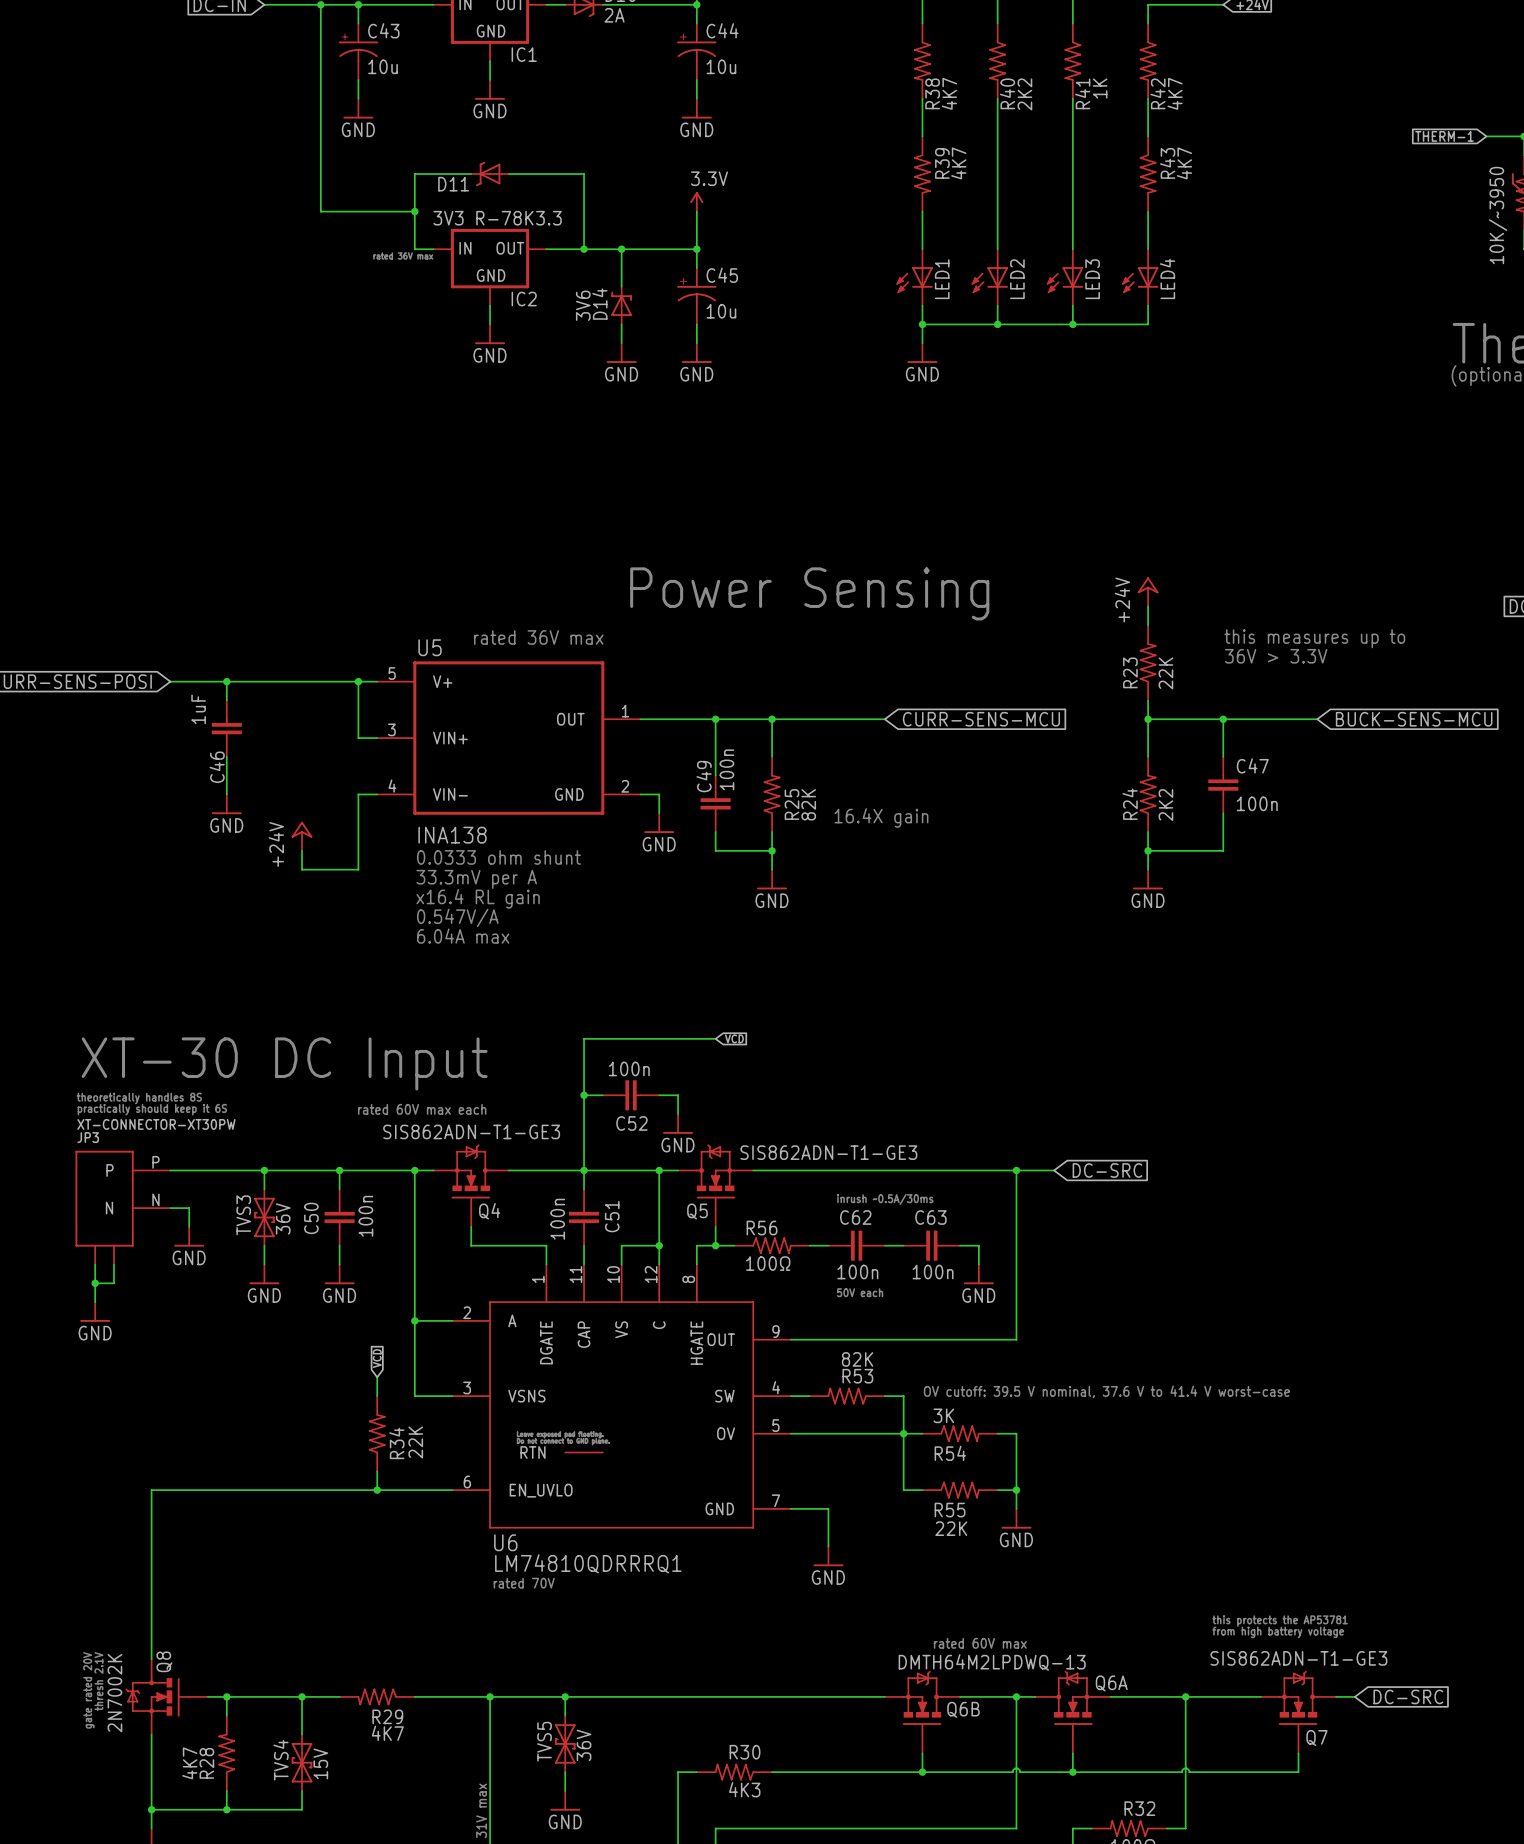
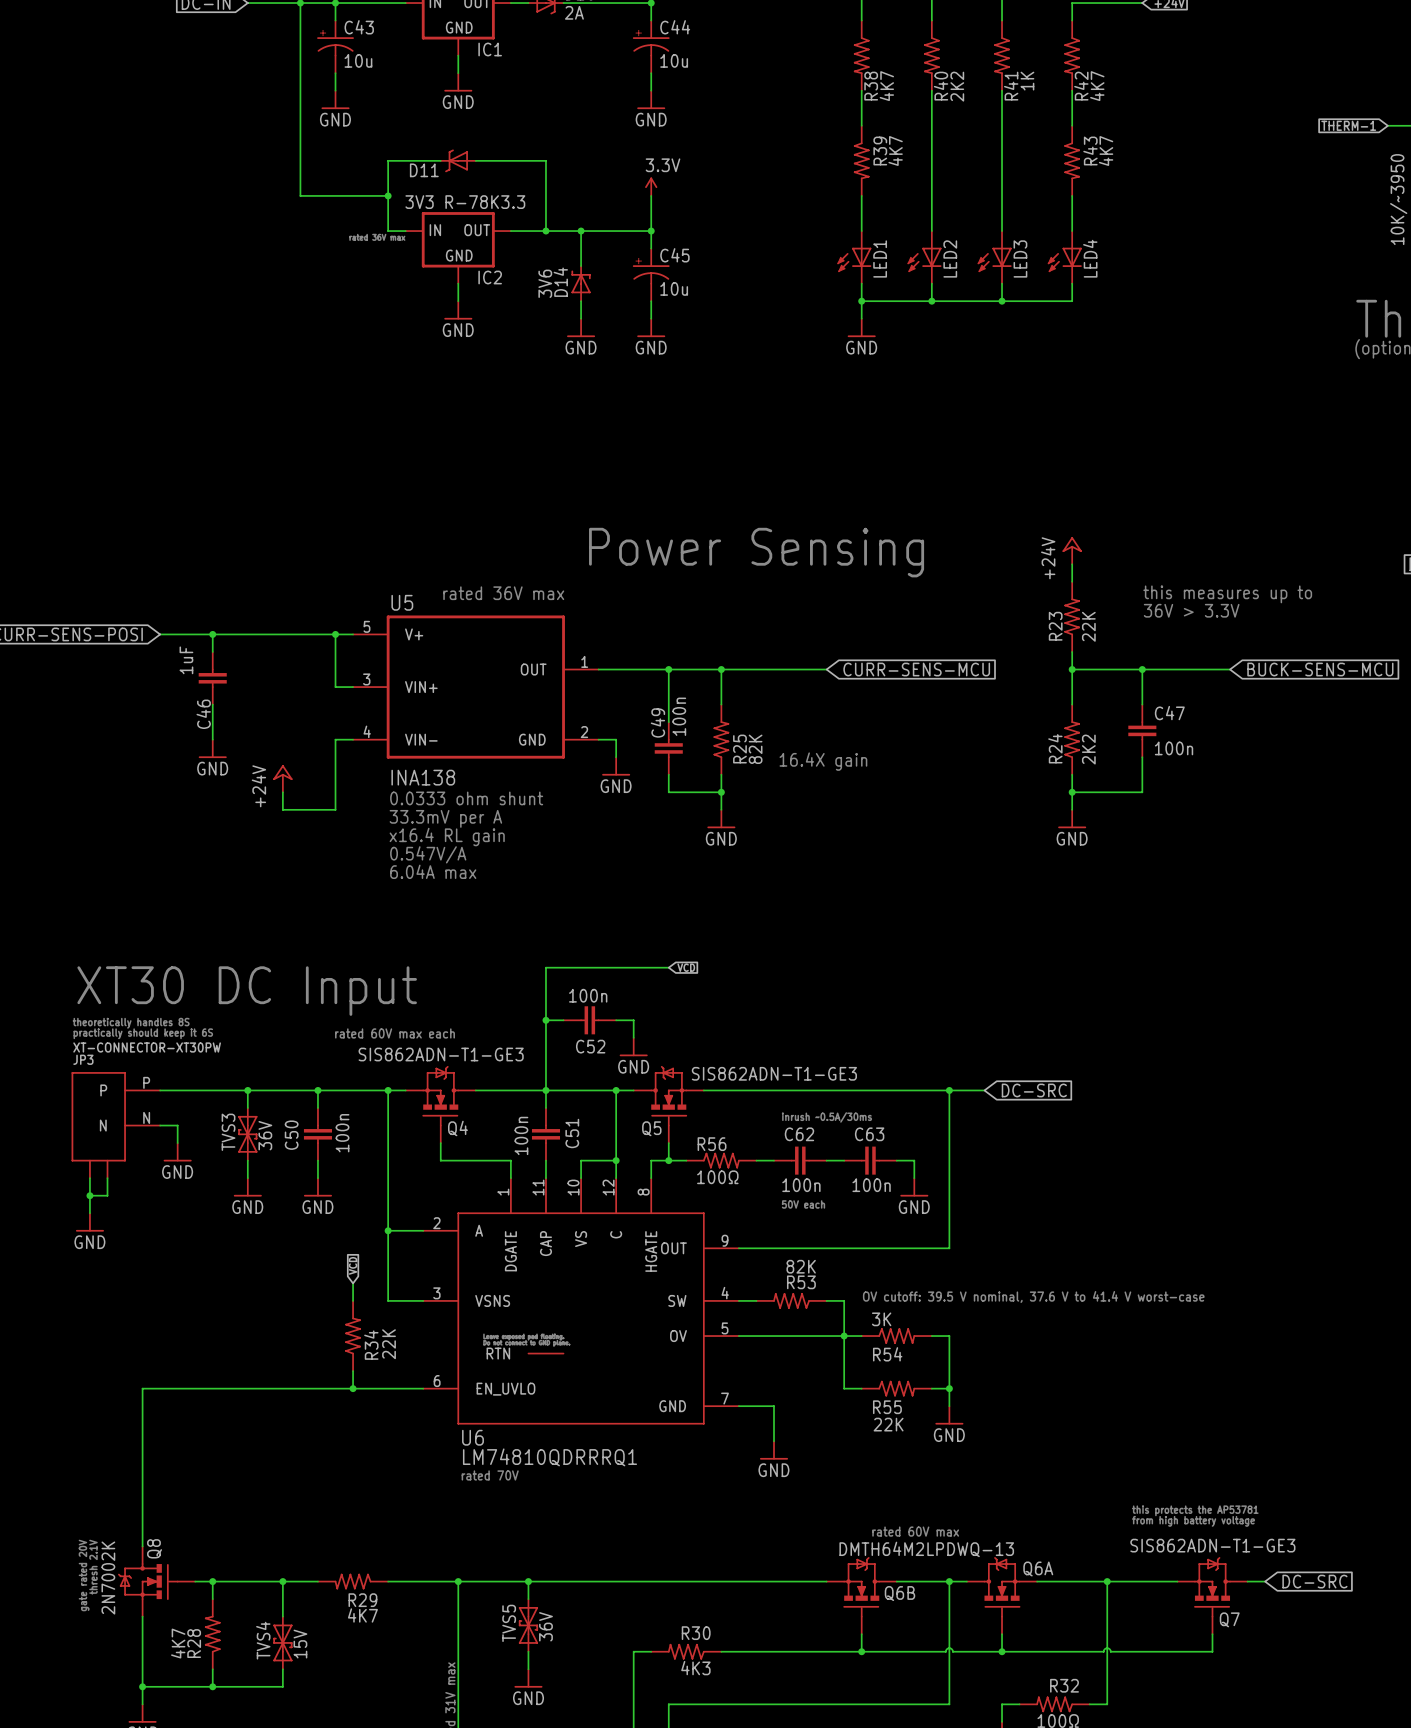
text: XT-30 DC Input (284, 1063) -> XT30 DC Input (247, 991)

